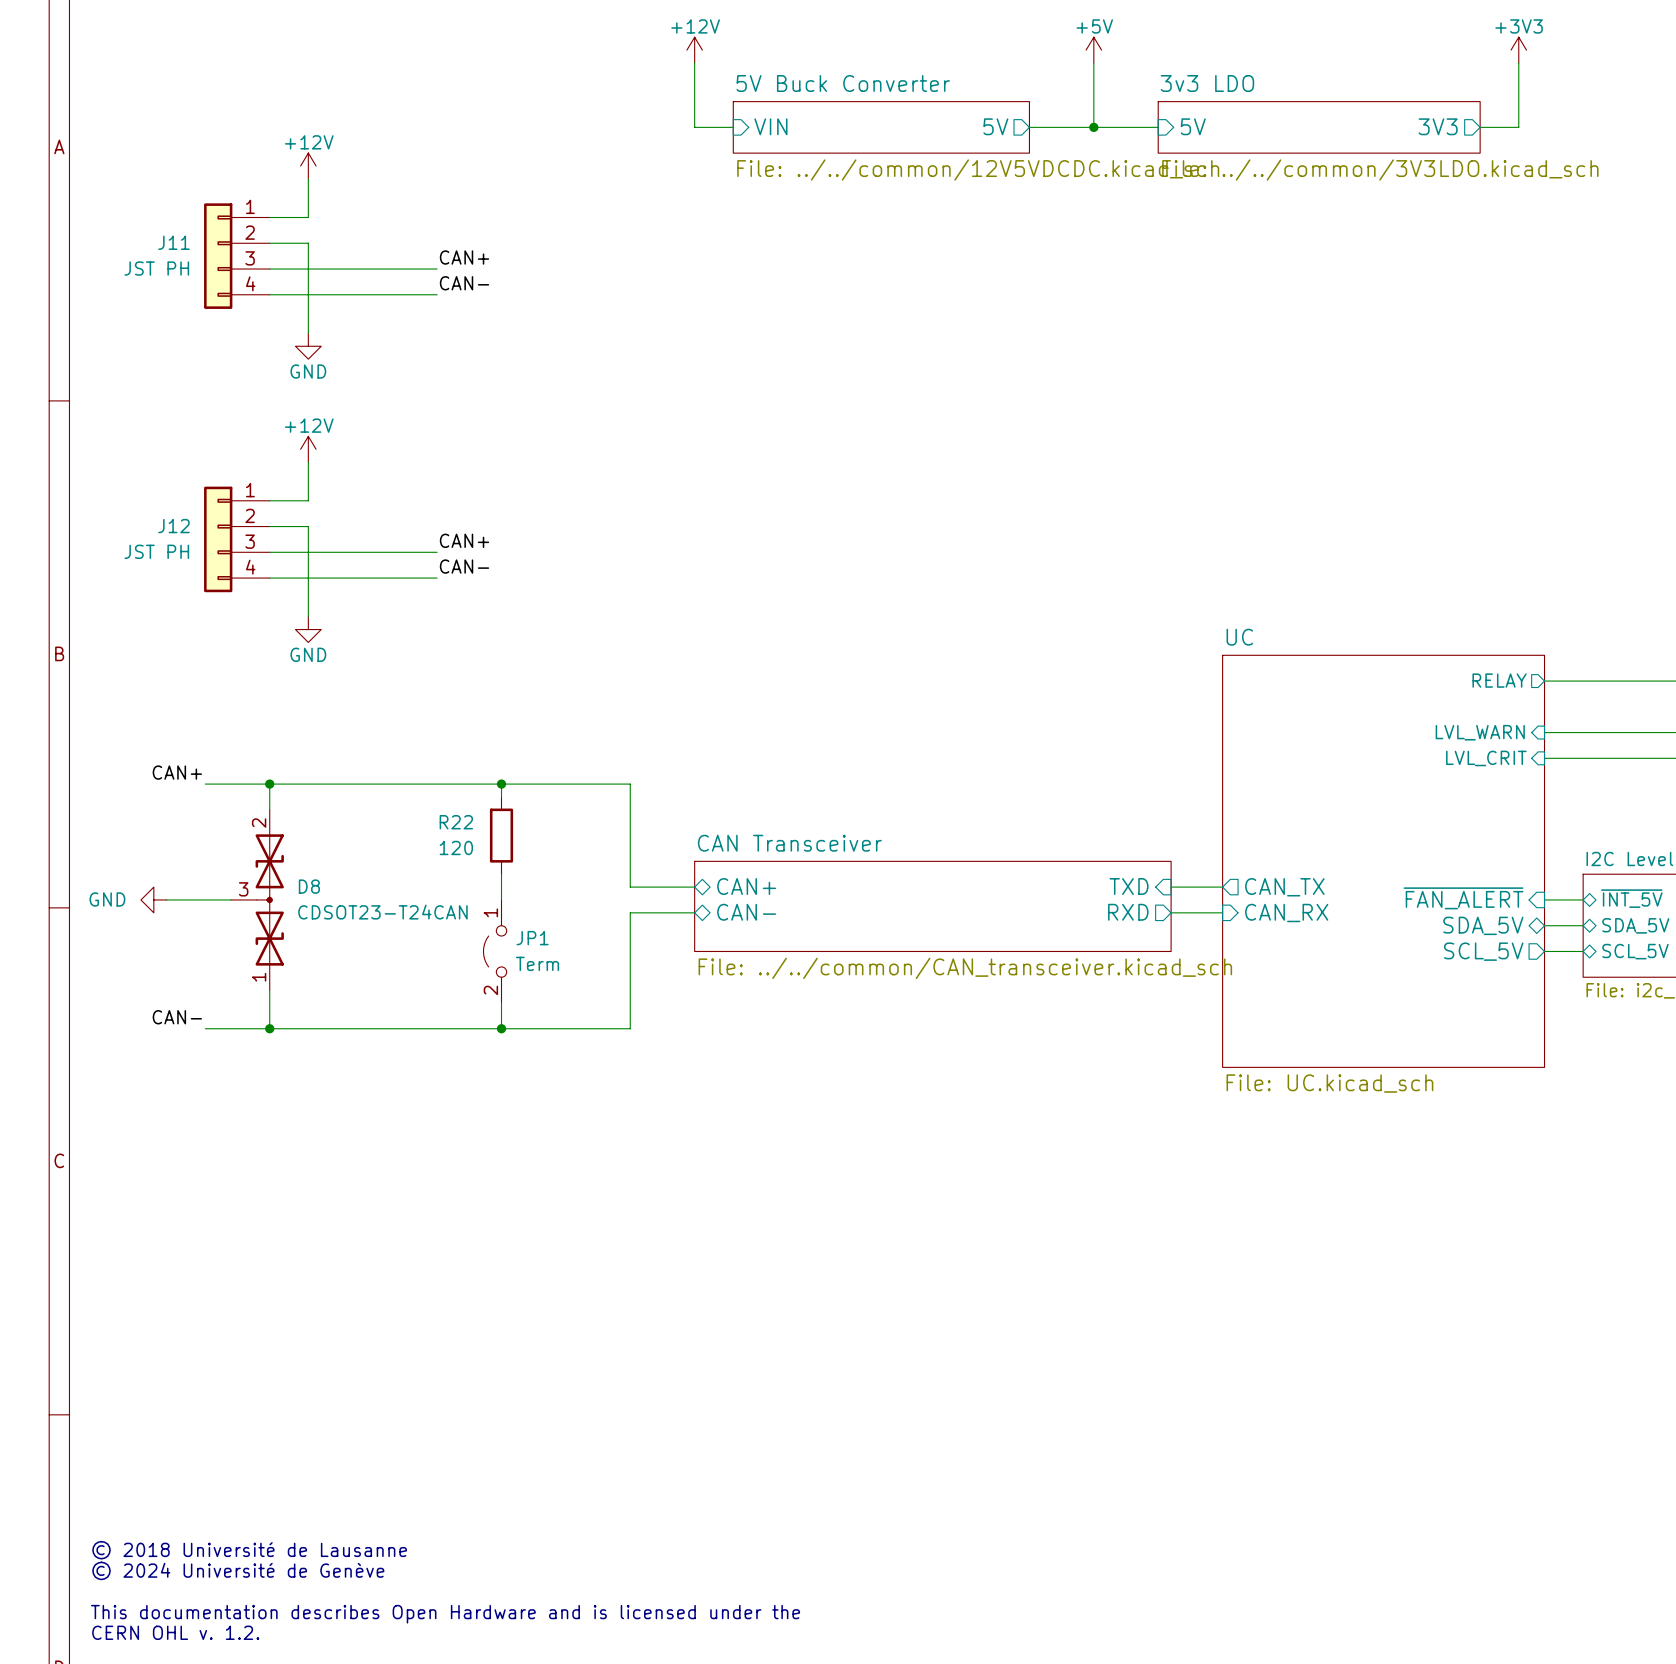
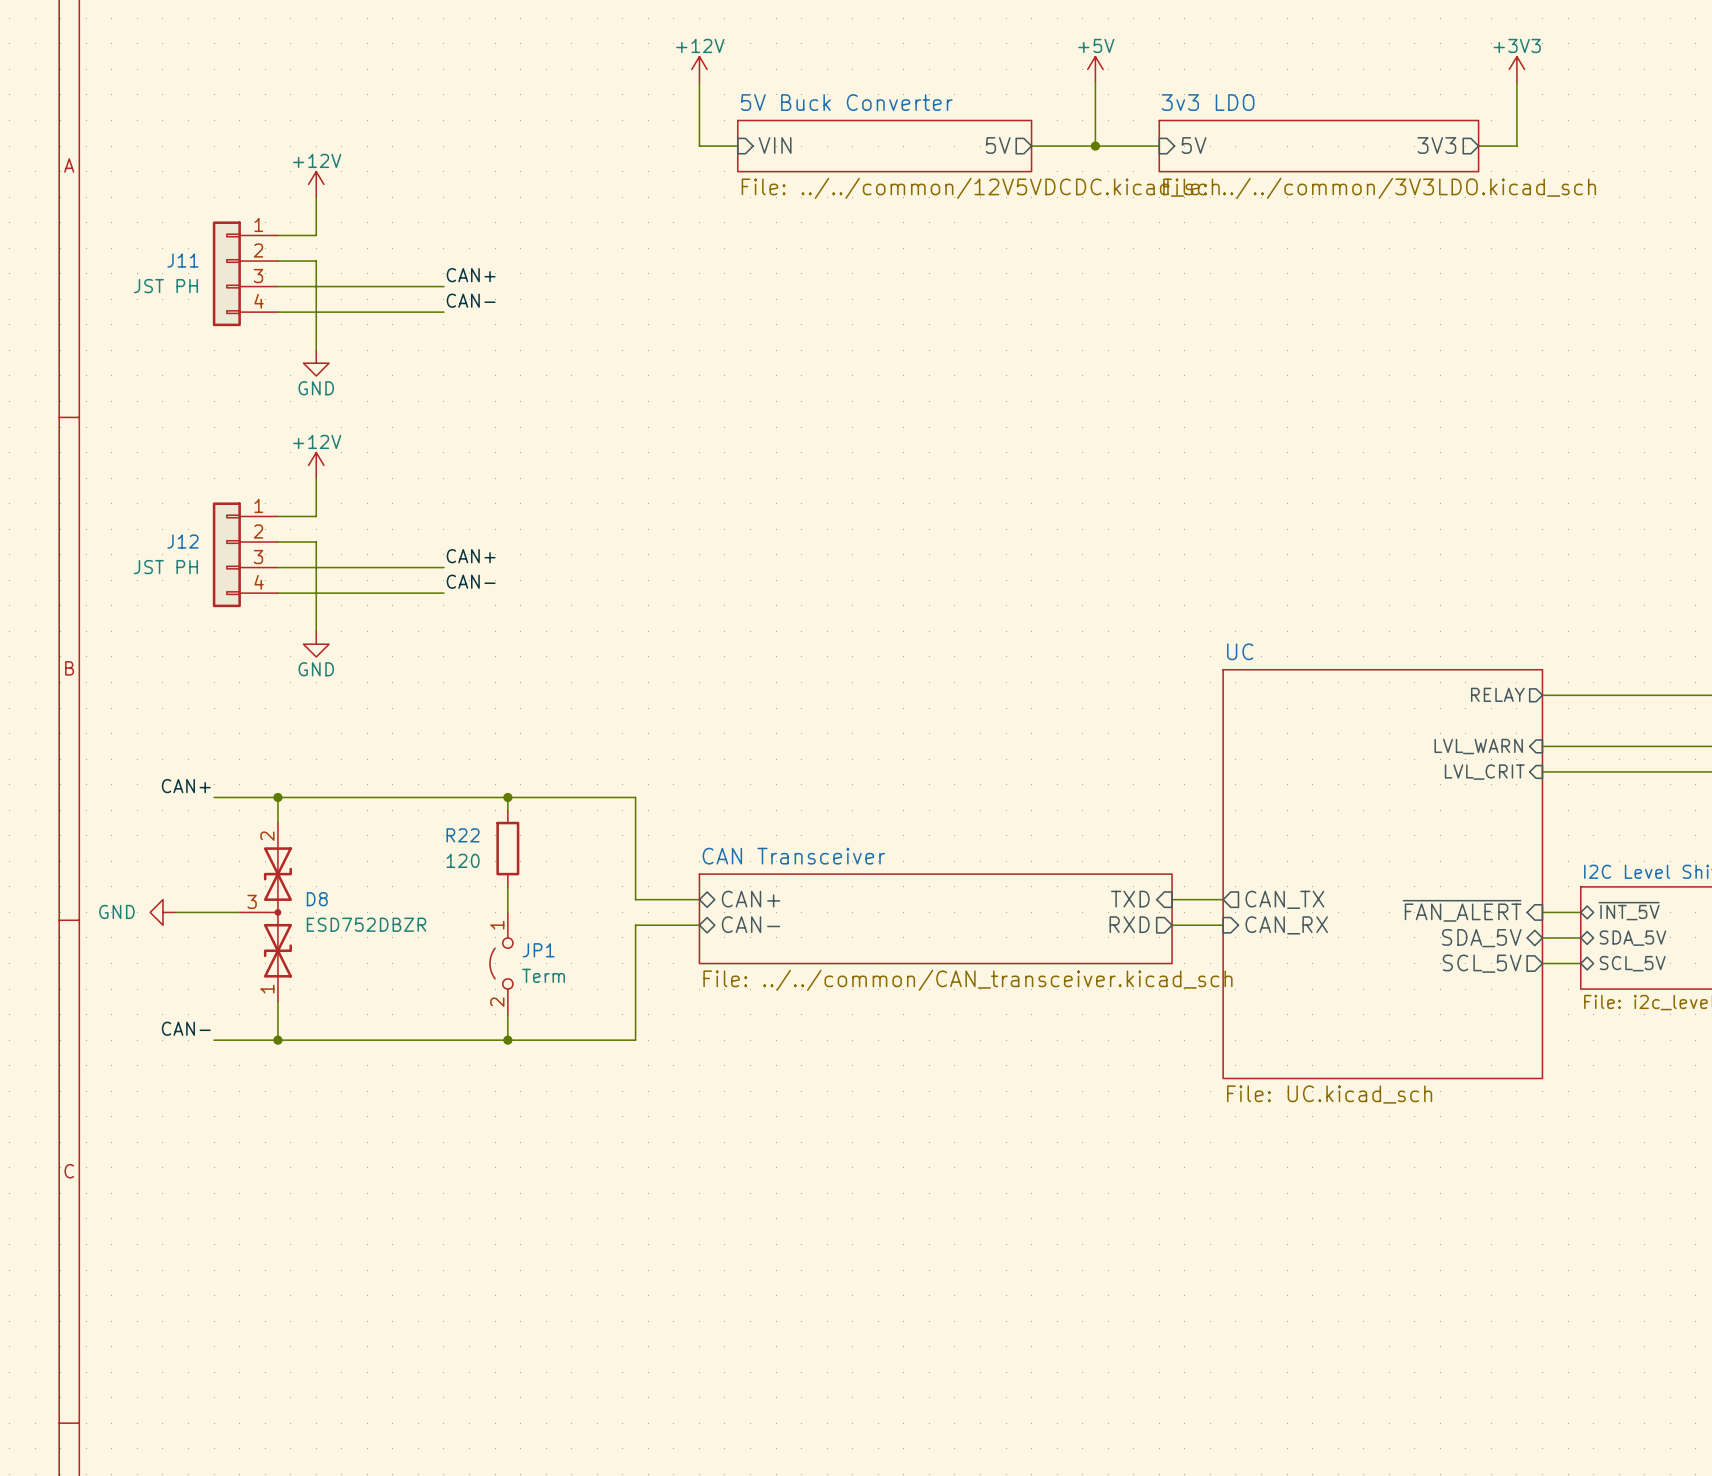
D8 value: CDSOT23-T24CAN (382, 912) -> ESD752DBZR (366, 924)

